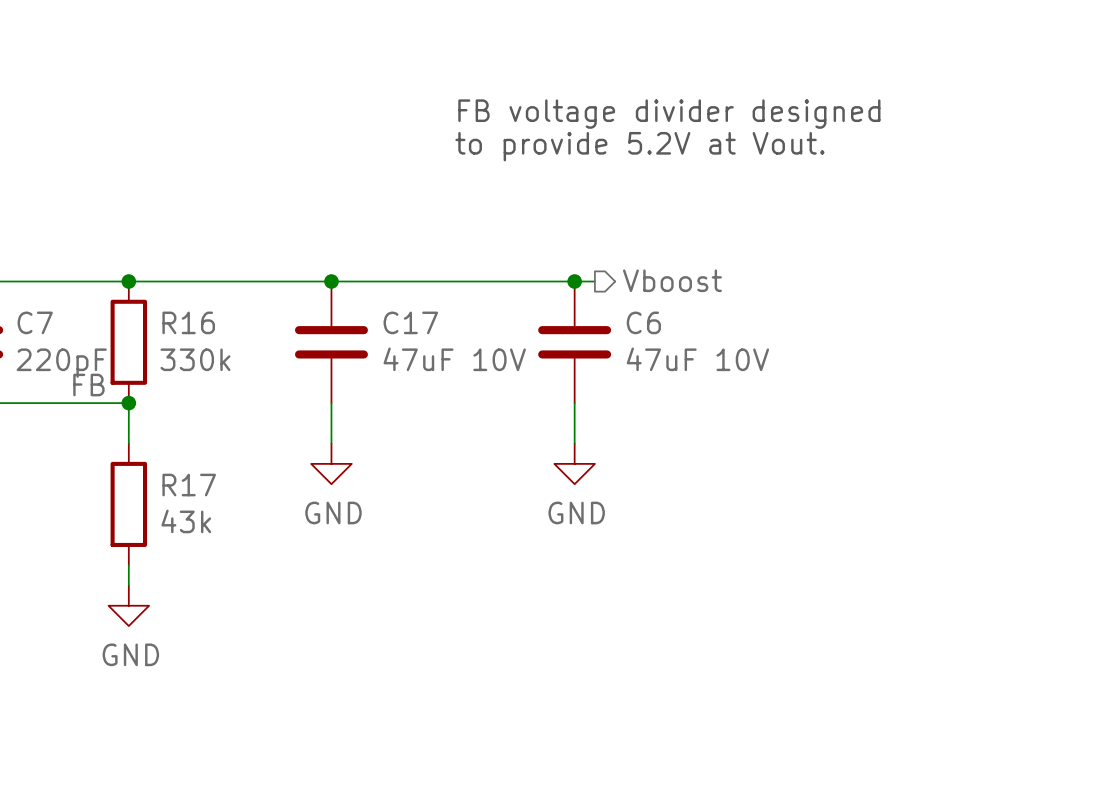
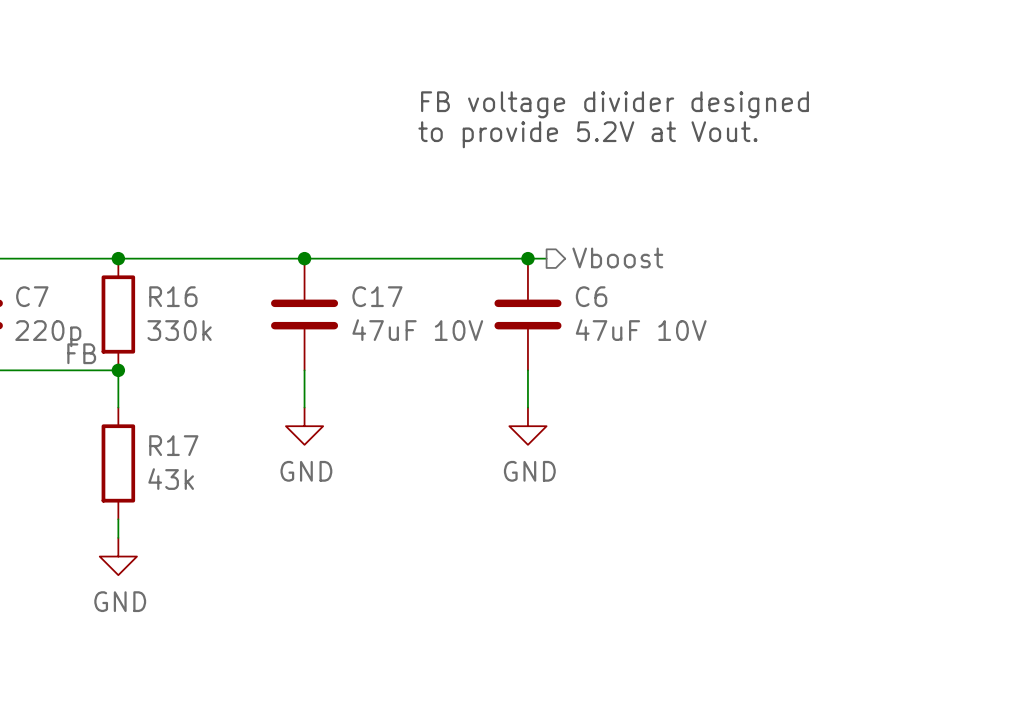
C7 value: 220pF (61, 363) -> 220p (48, 333)

